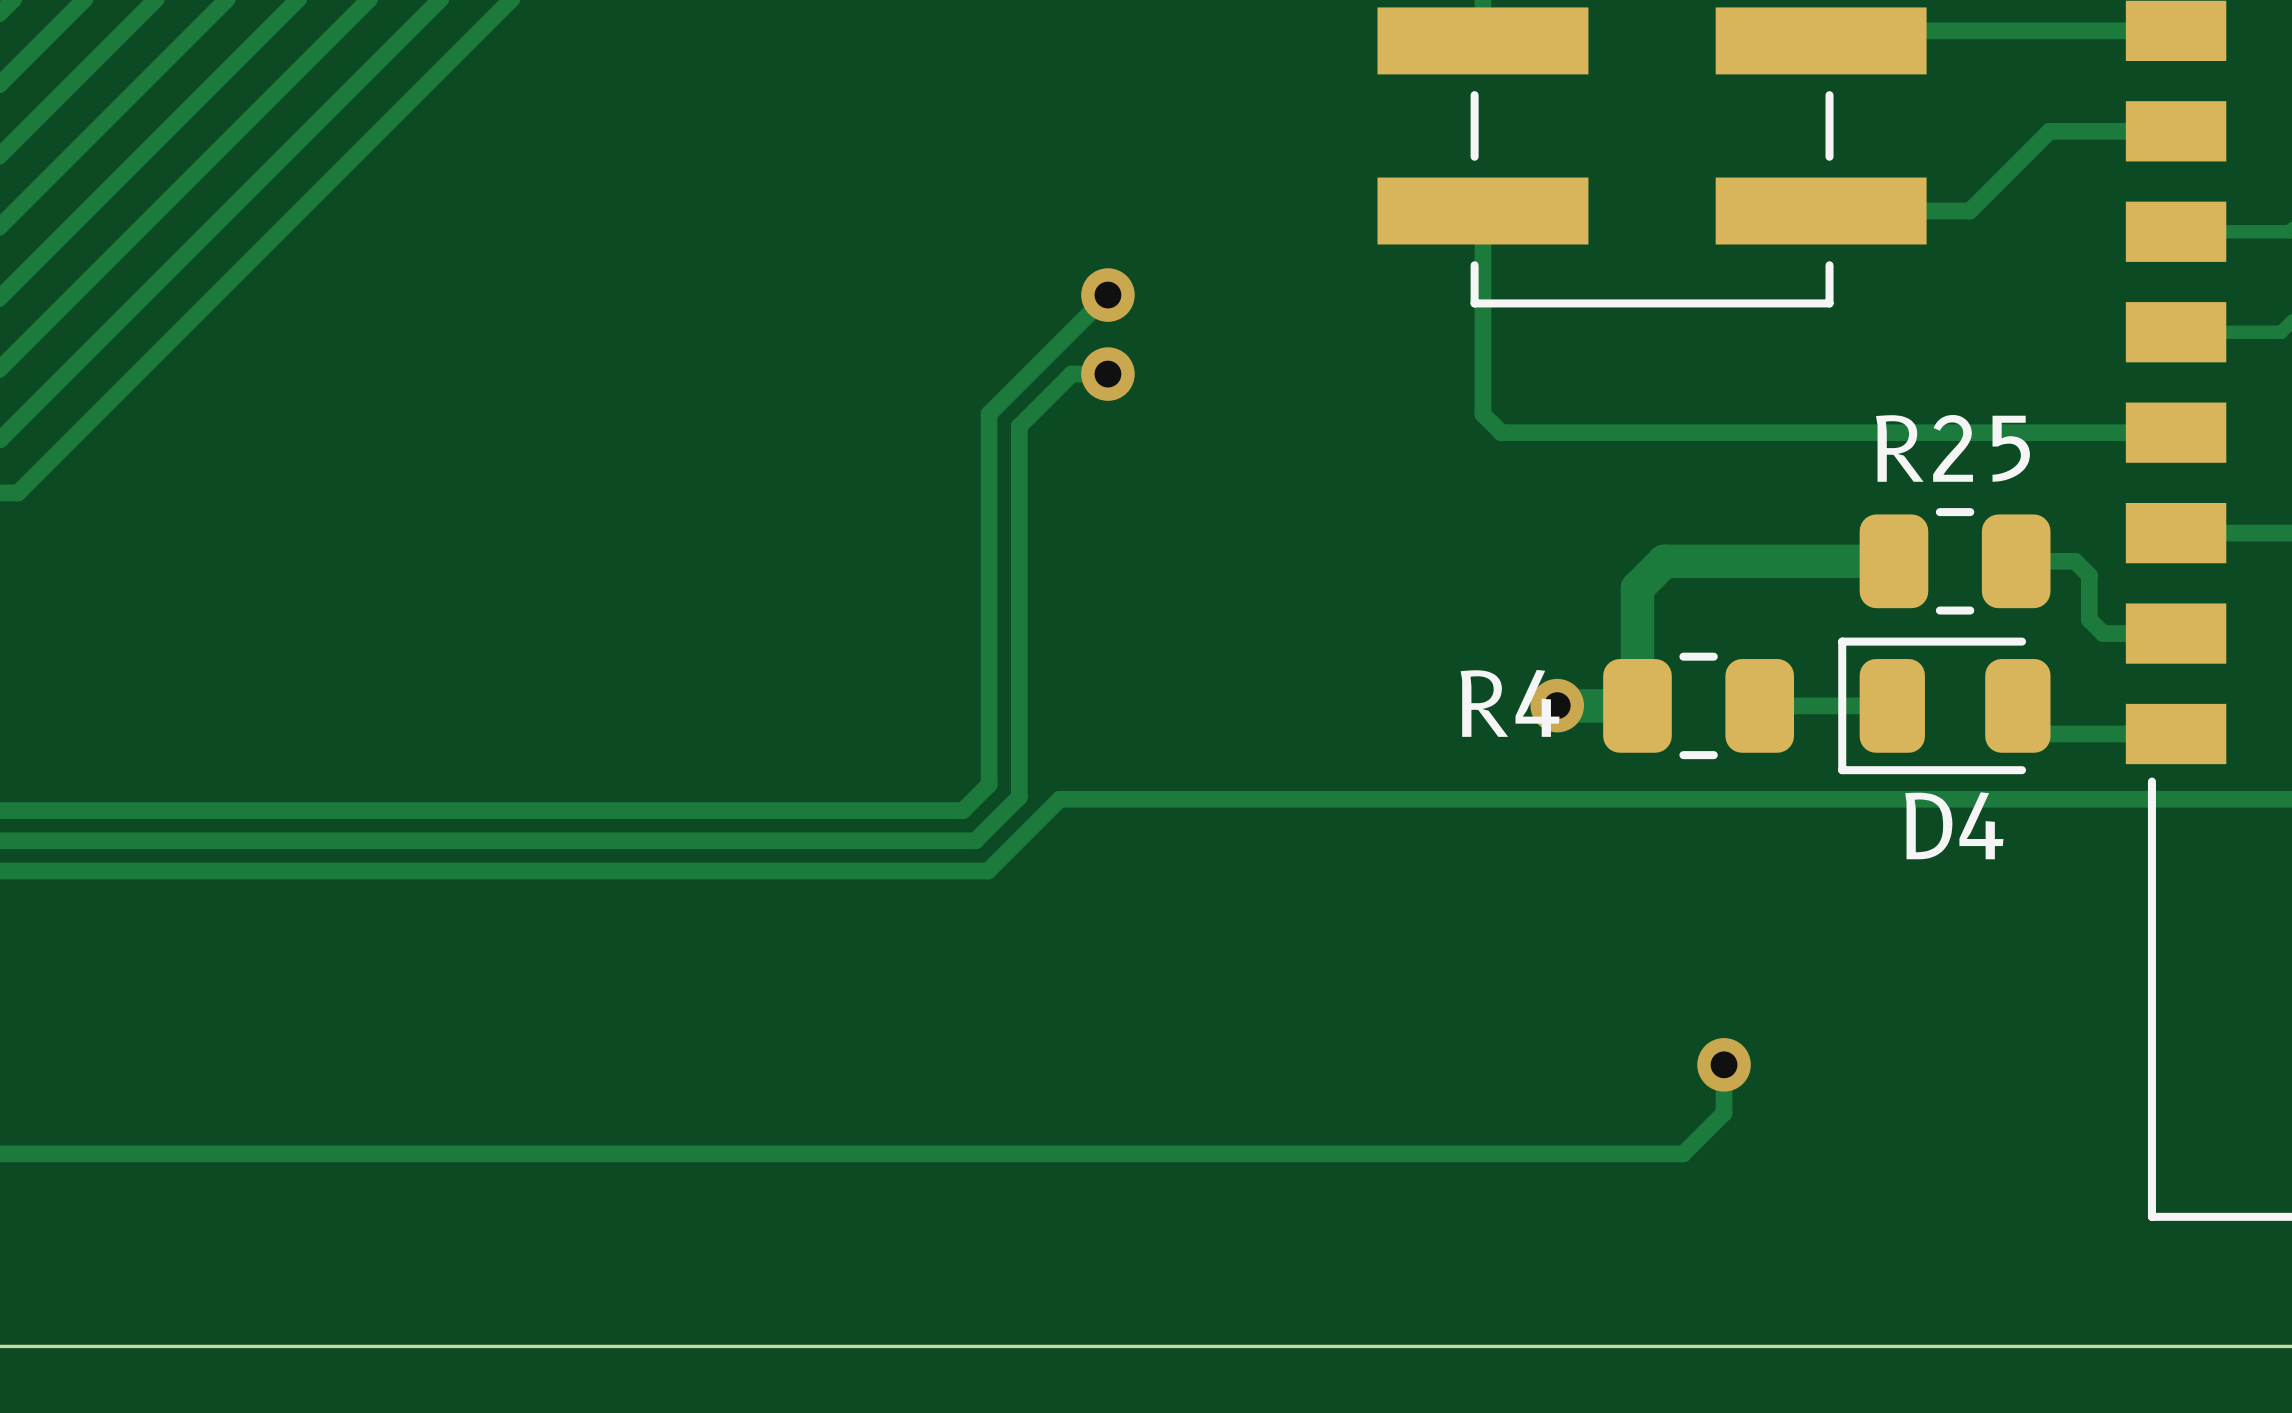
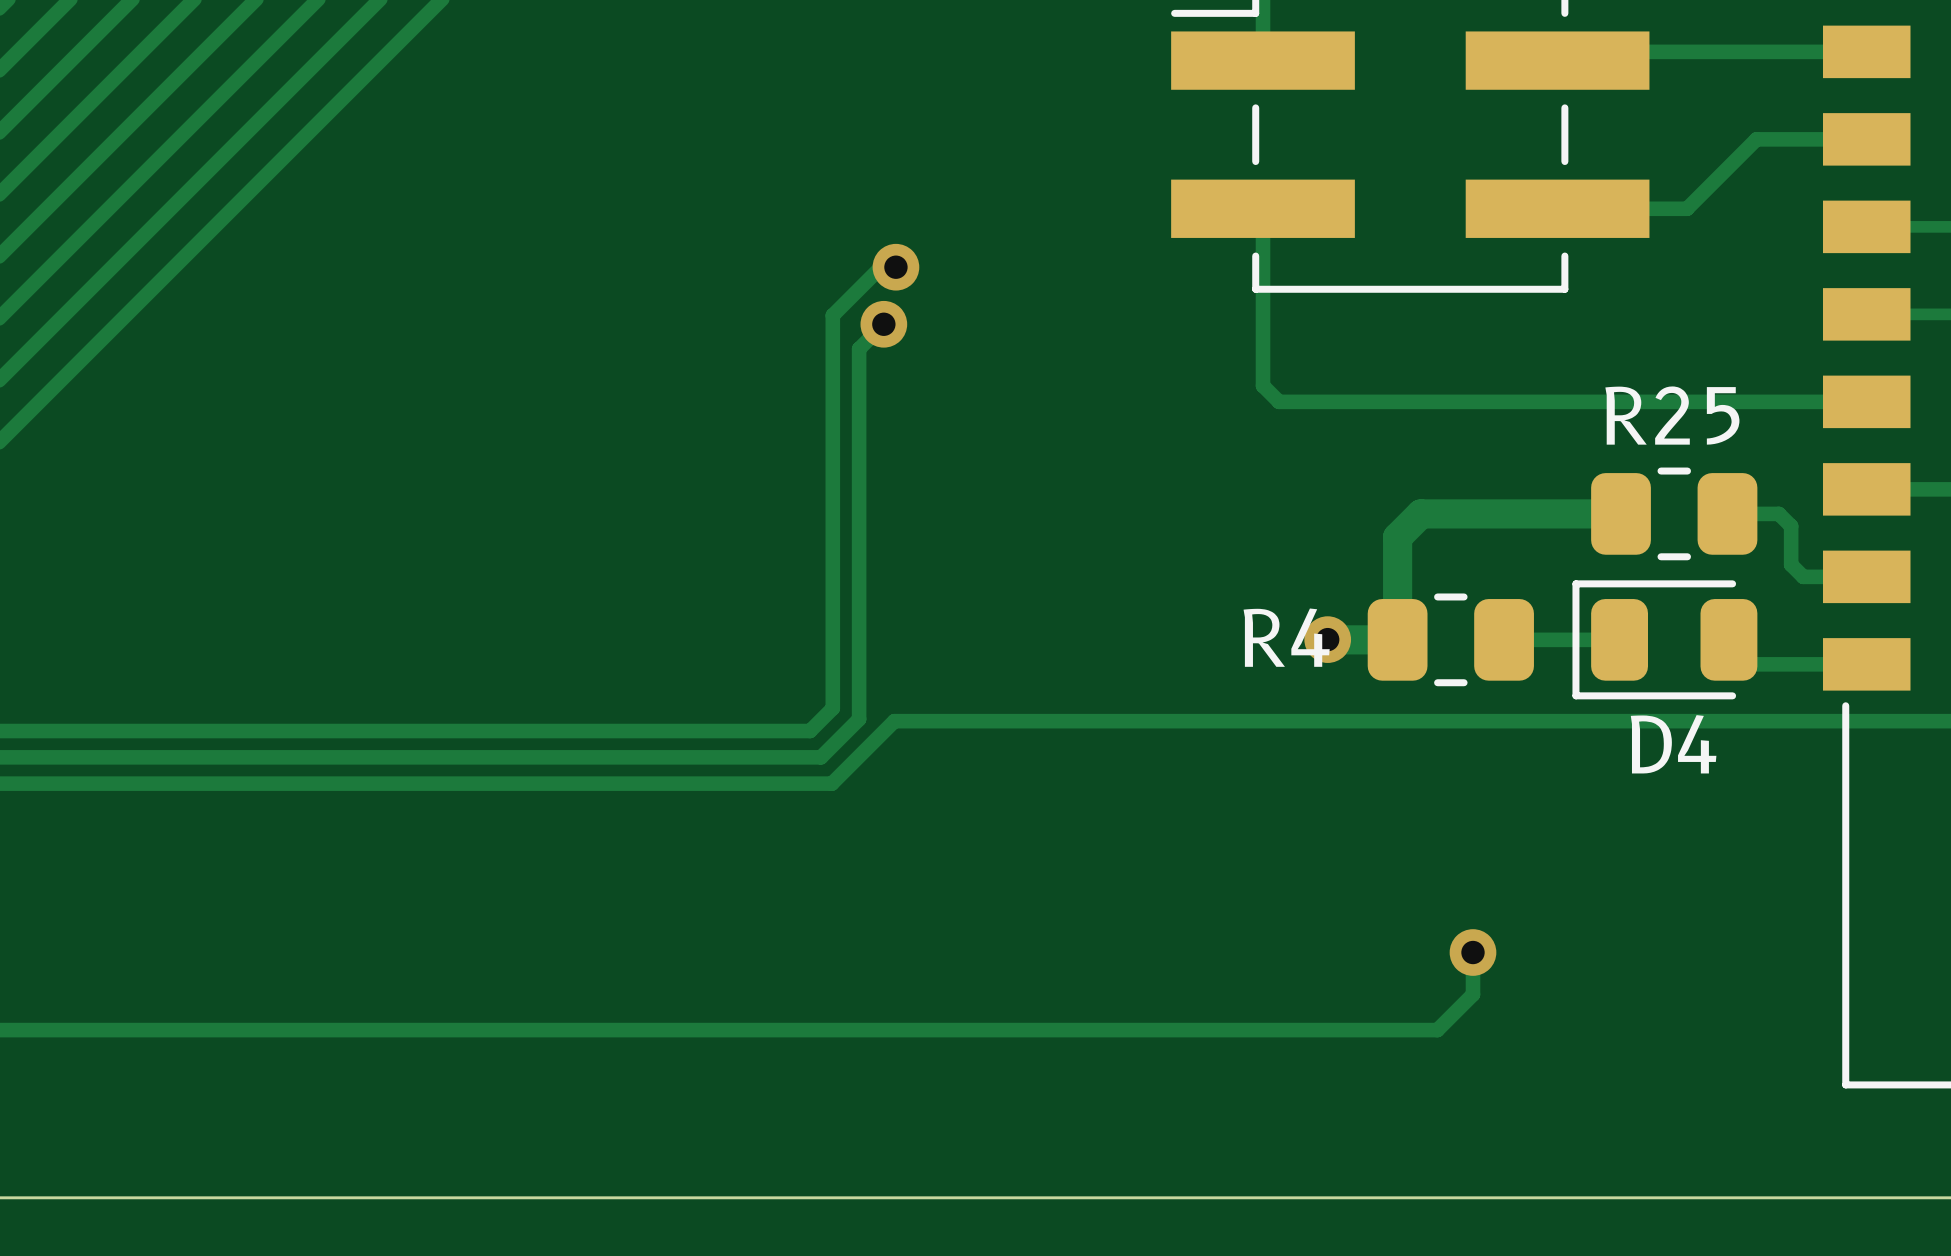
track: (1107, 295) (989, 413) -> (895, 267) (882, 265) (832, 315) (832, 385)
via position: (1107, 295) -> (895, 267)
via: none -> (883, 324)
track: (1107, 374) (1071, 374) (1019, 426) -> (883, 324) (859, 349) (859, 396)
via: (1107, 374) -> none

